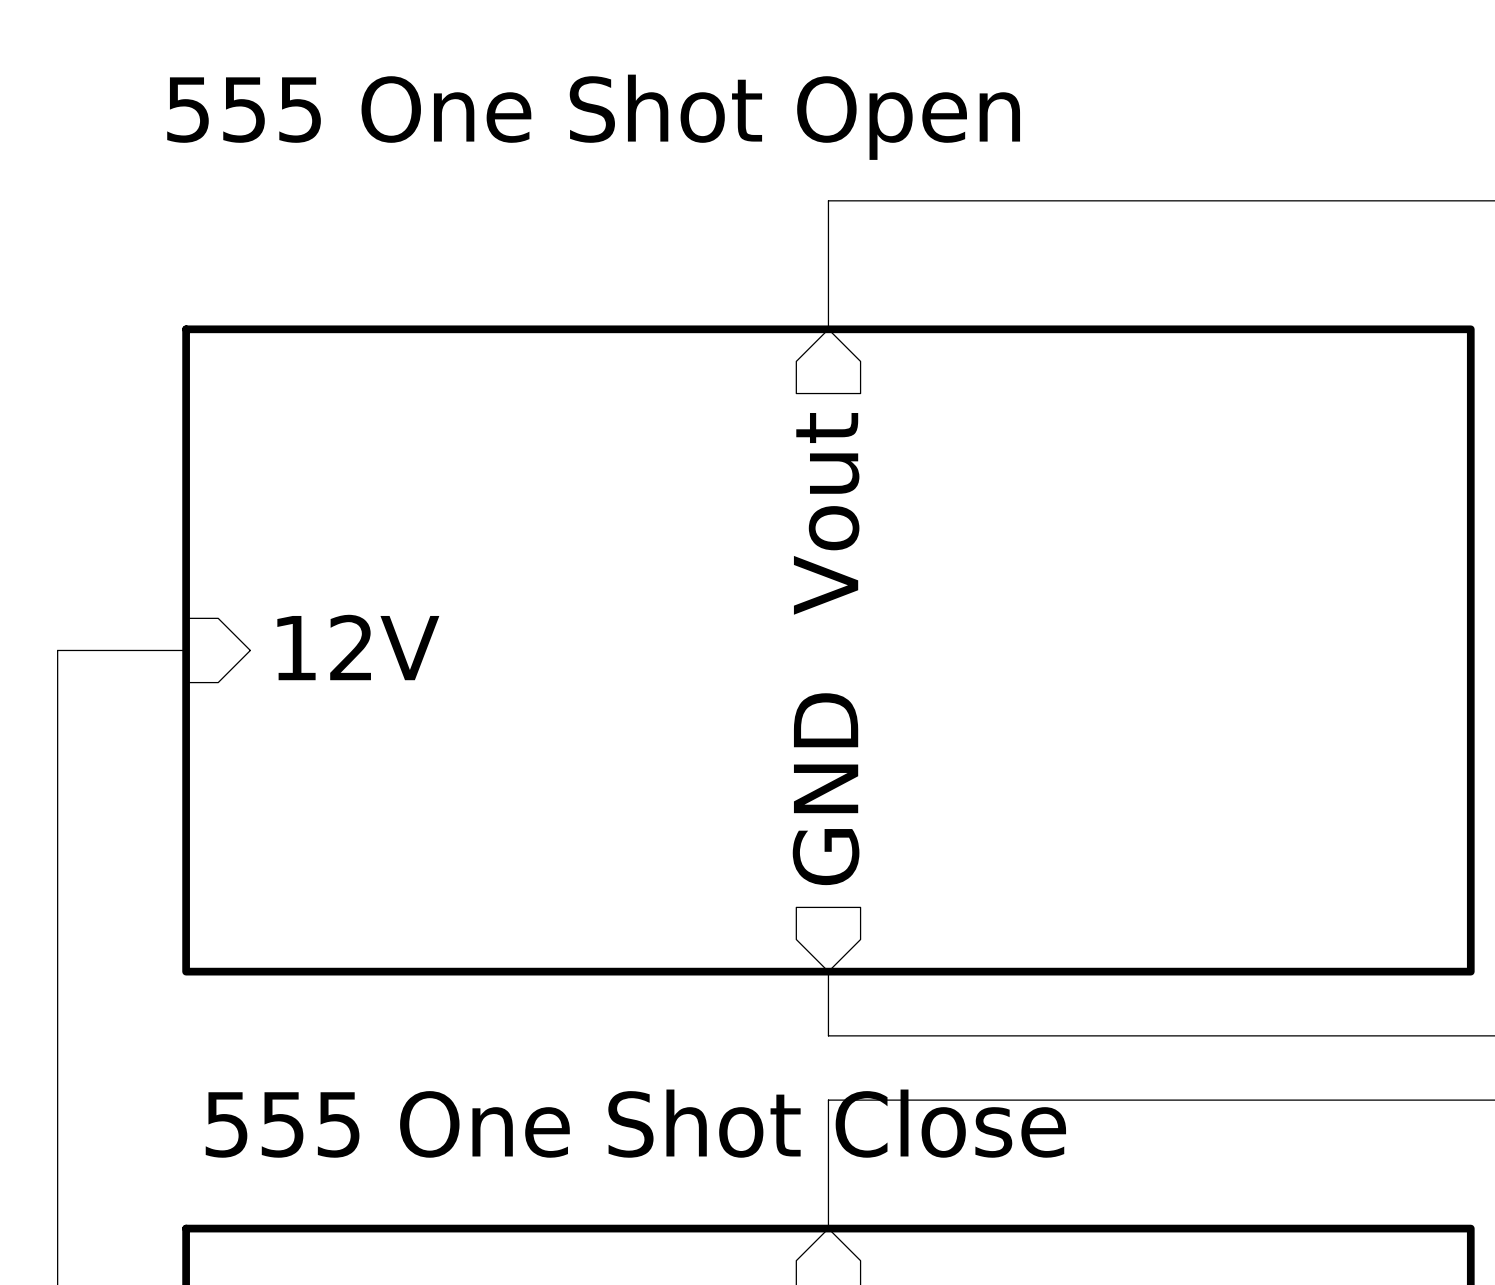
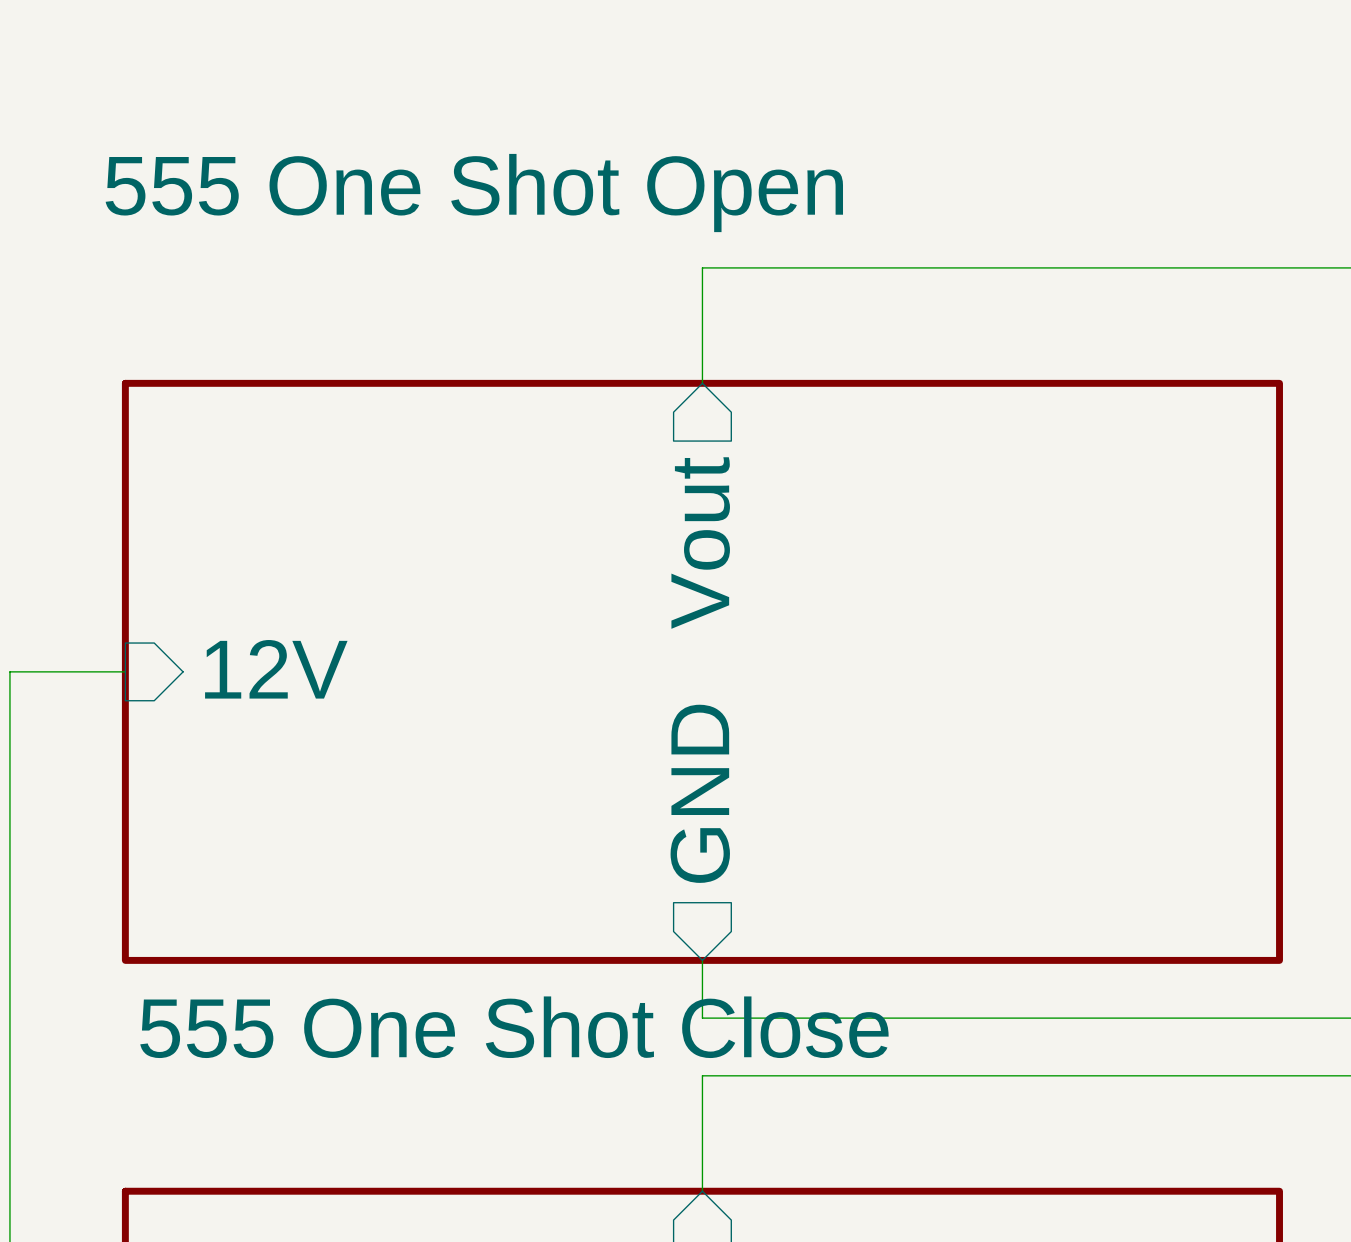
sheet 555 One Shot Close name position: 555 One Shot Close (635, 1123) -> 555 One Shot Close (514, 1027)

